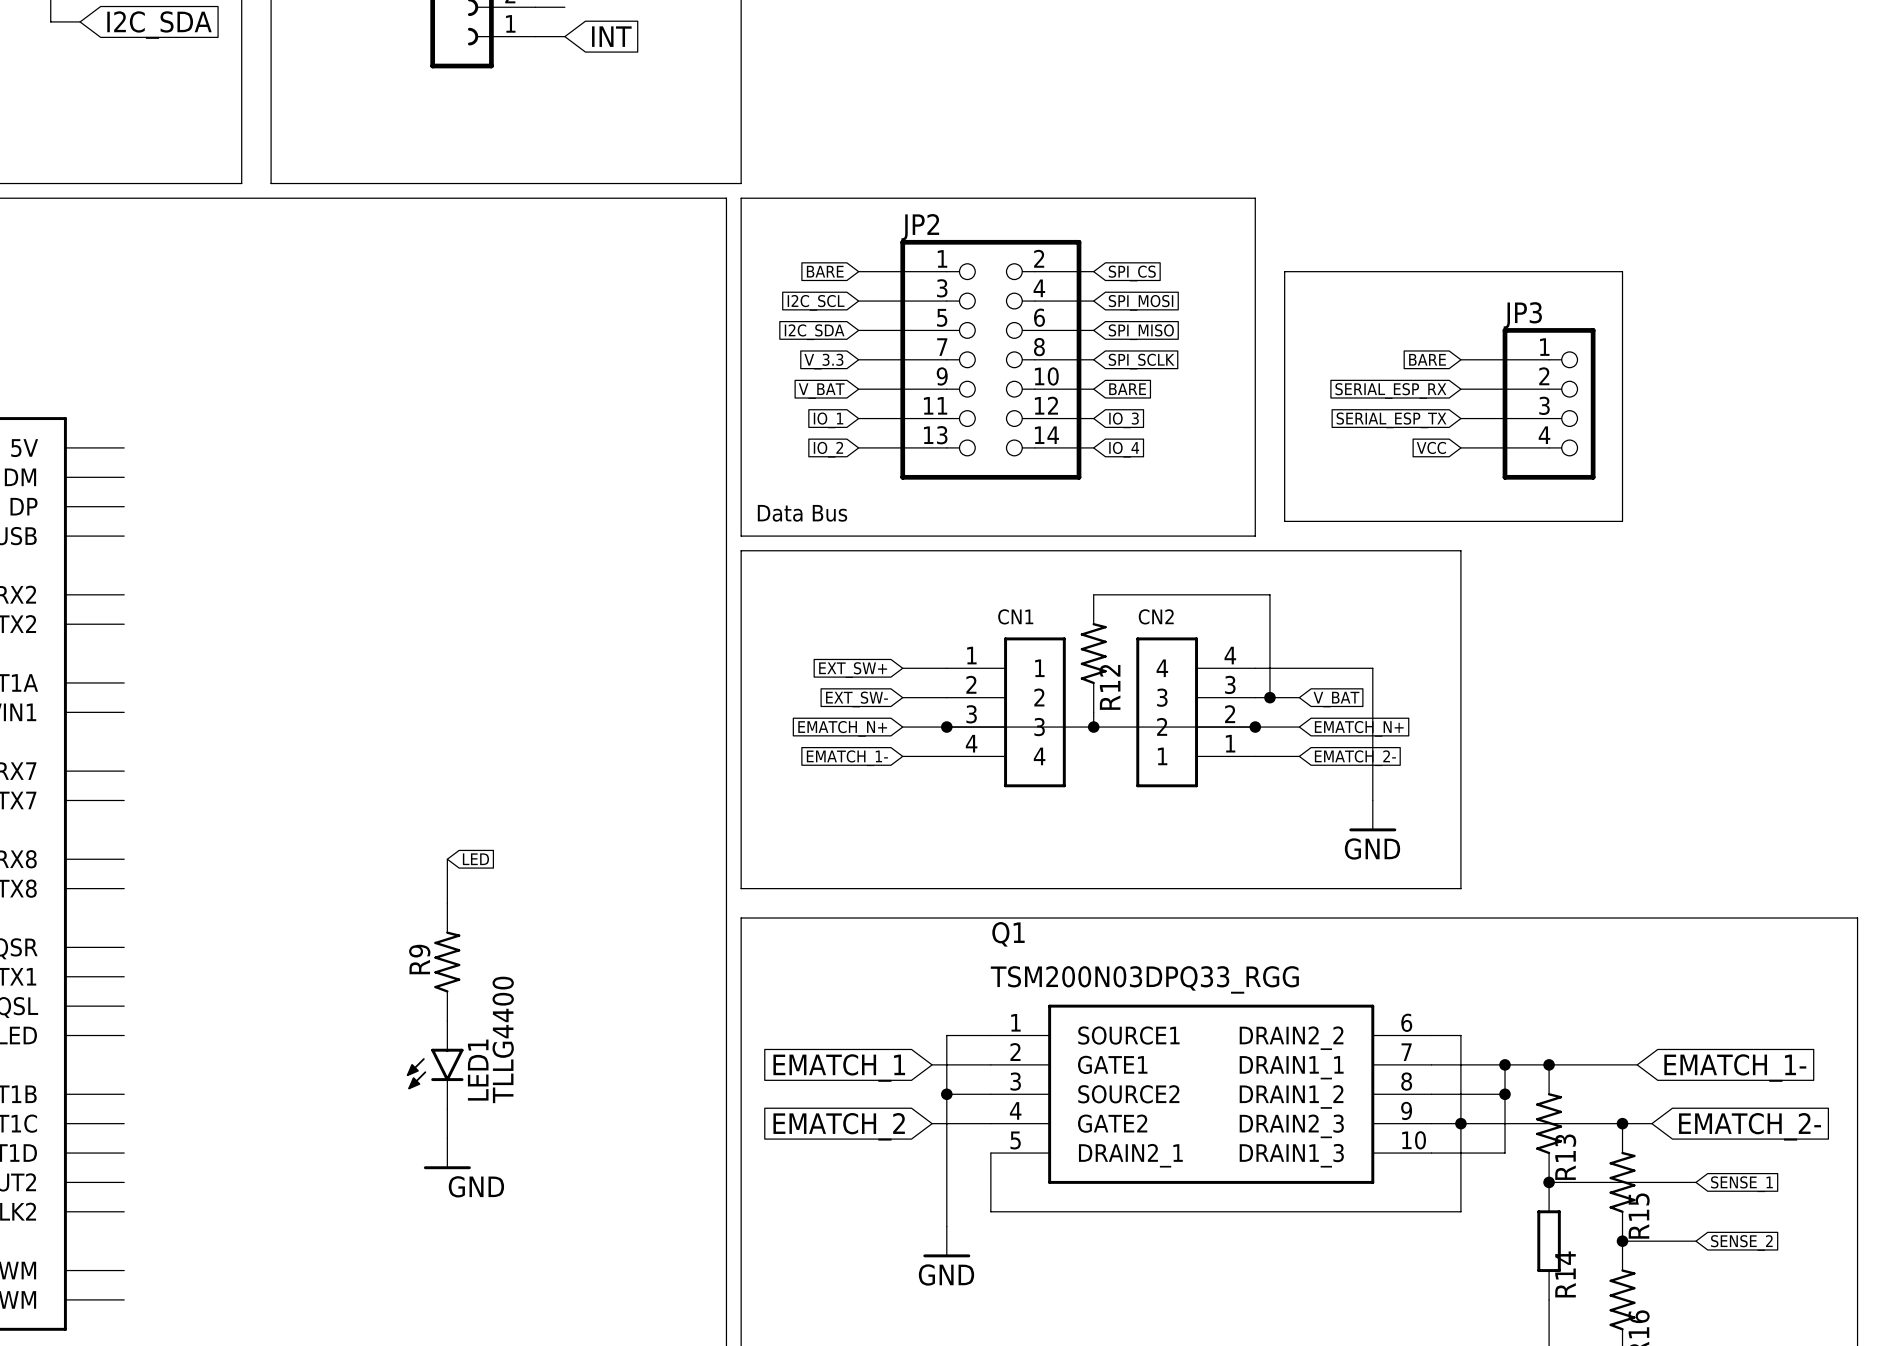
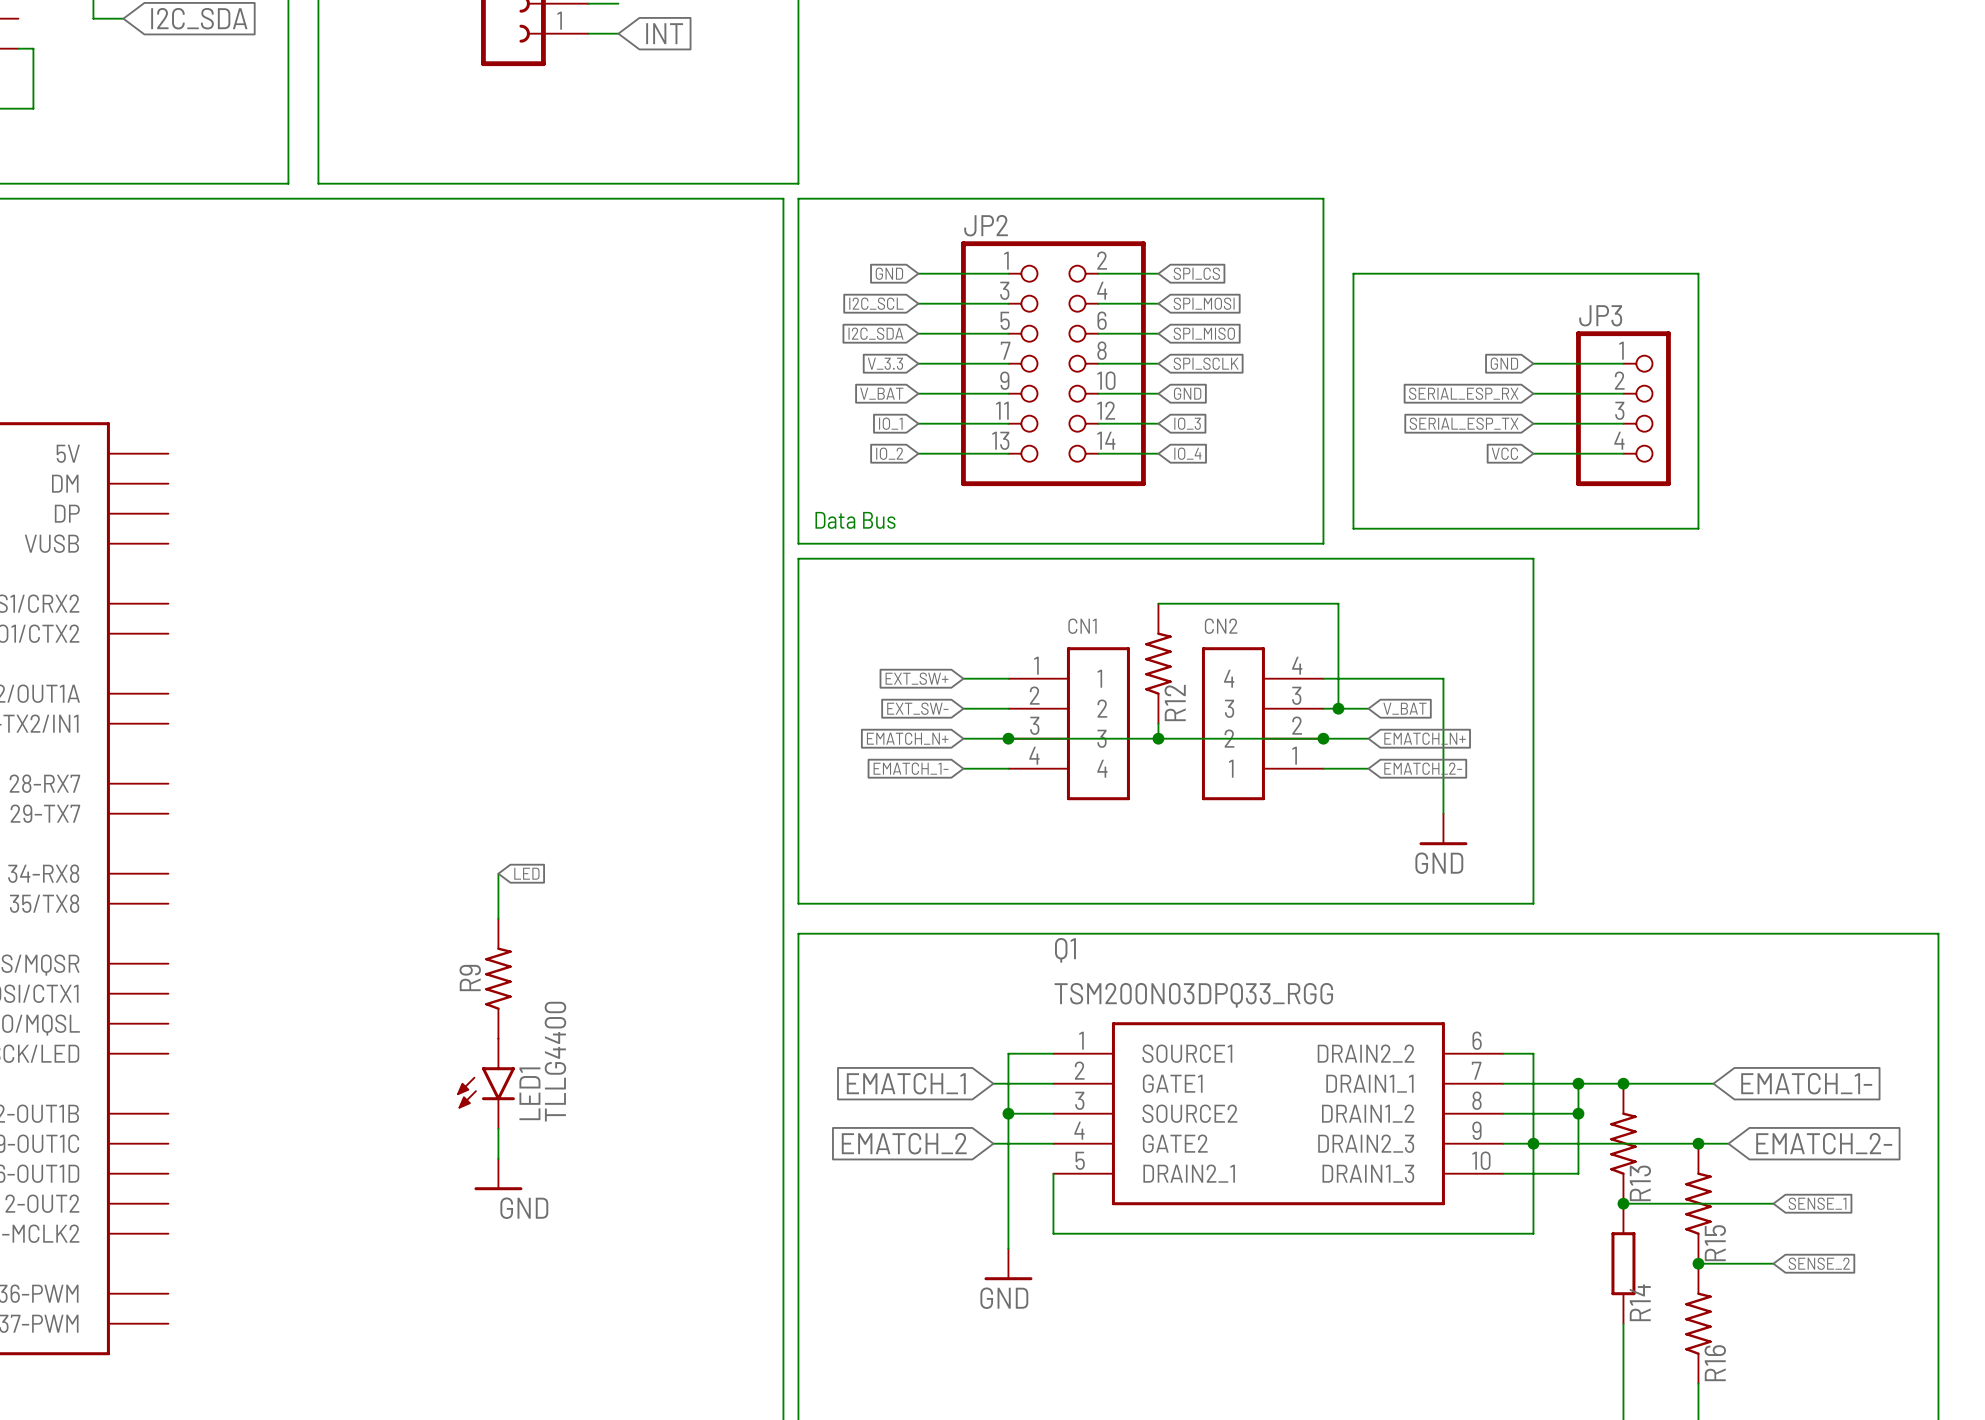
global label: BARE (825, 271) -> GND (889, 273)
global label: BARE (1427, 359) -> GND (1504, 363)
global label: BARE (1127, 389) -> GND (1187, 393)

